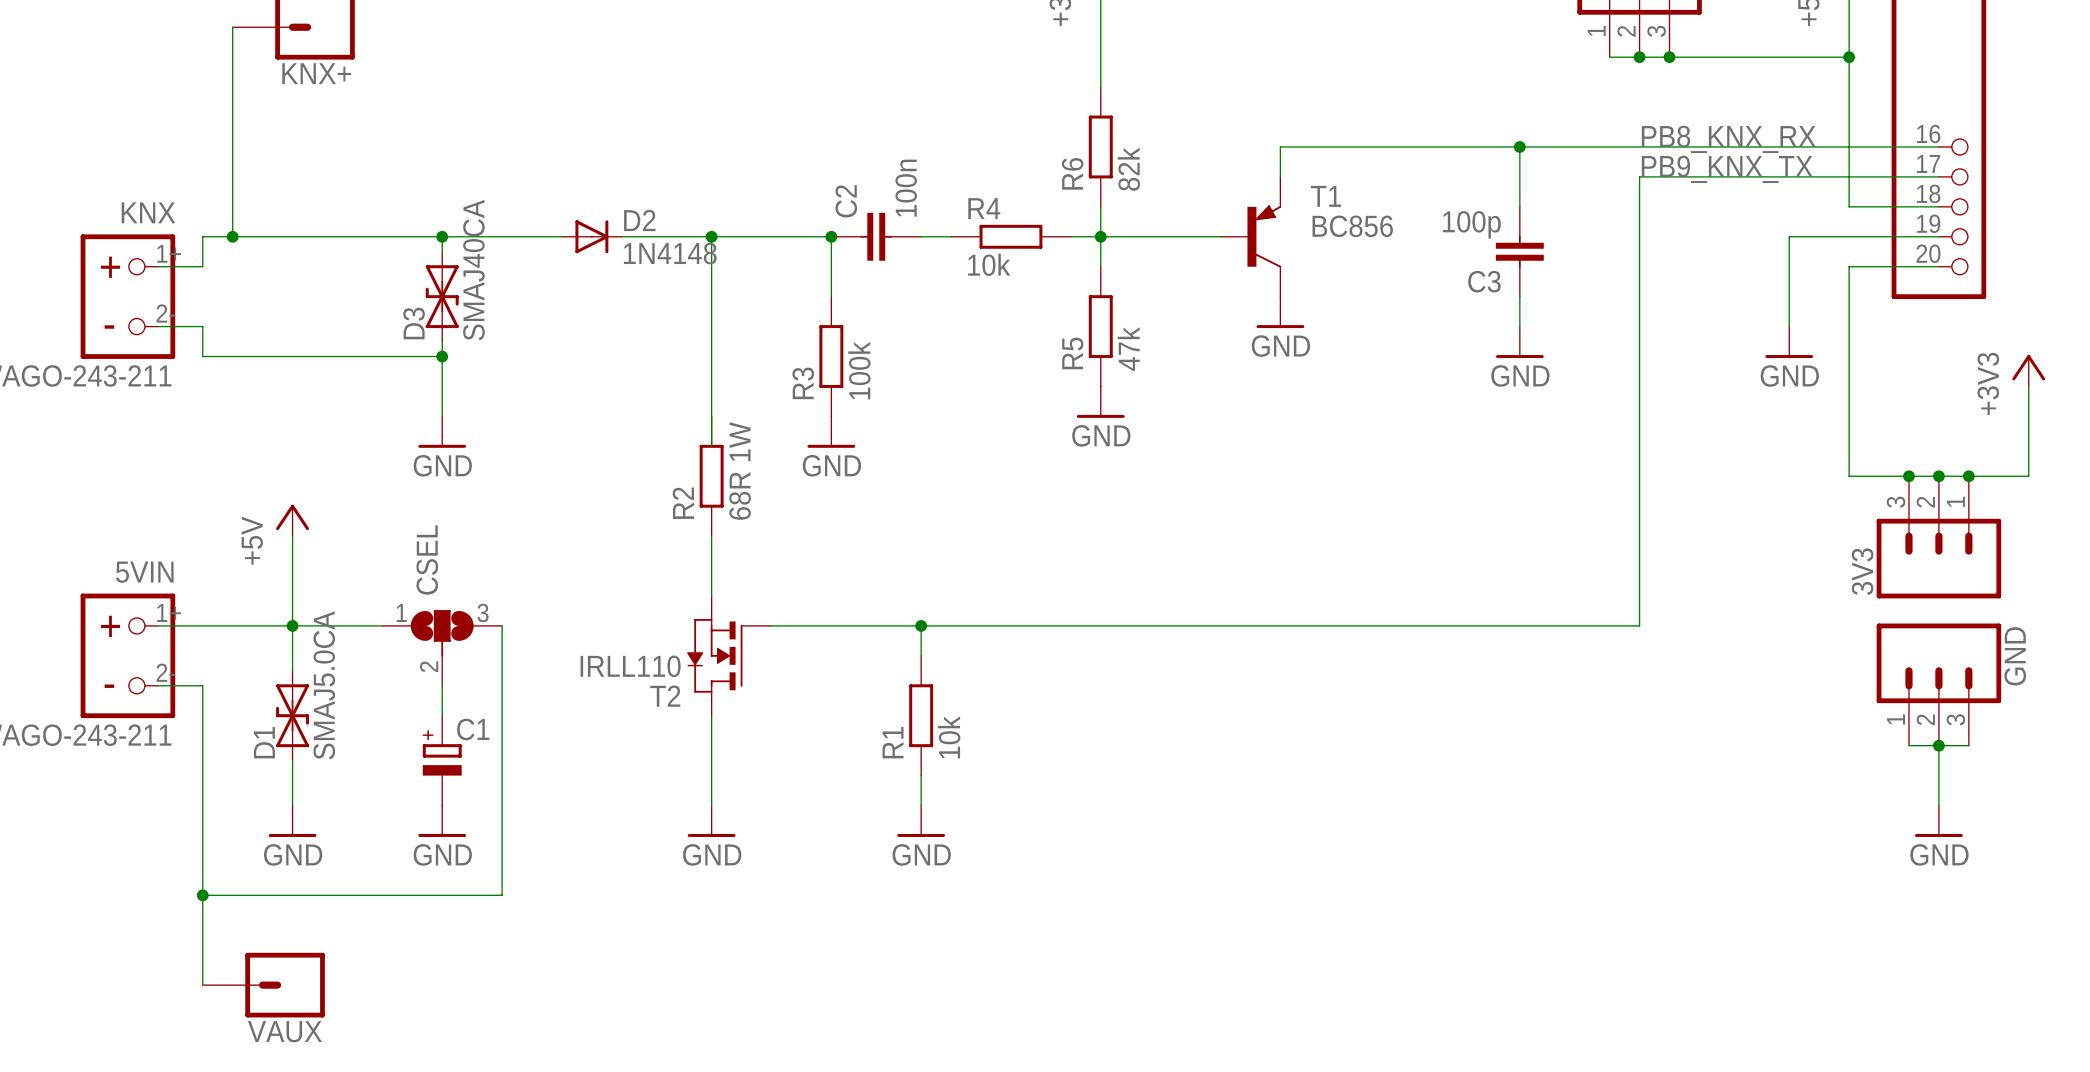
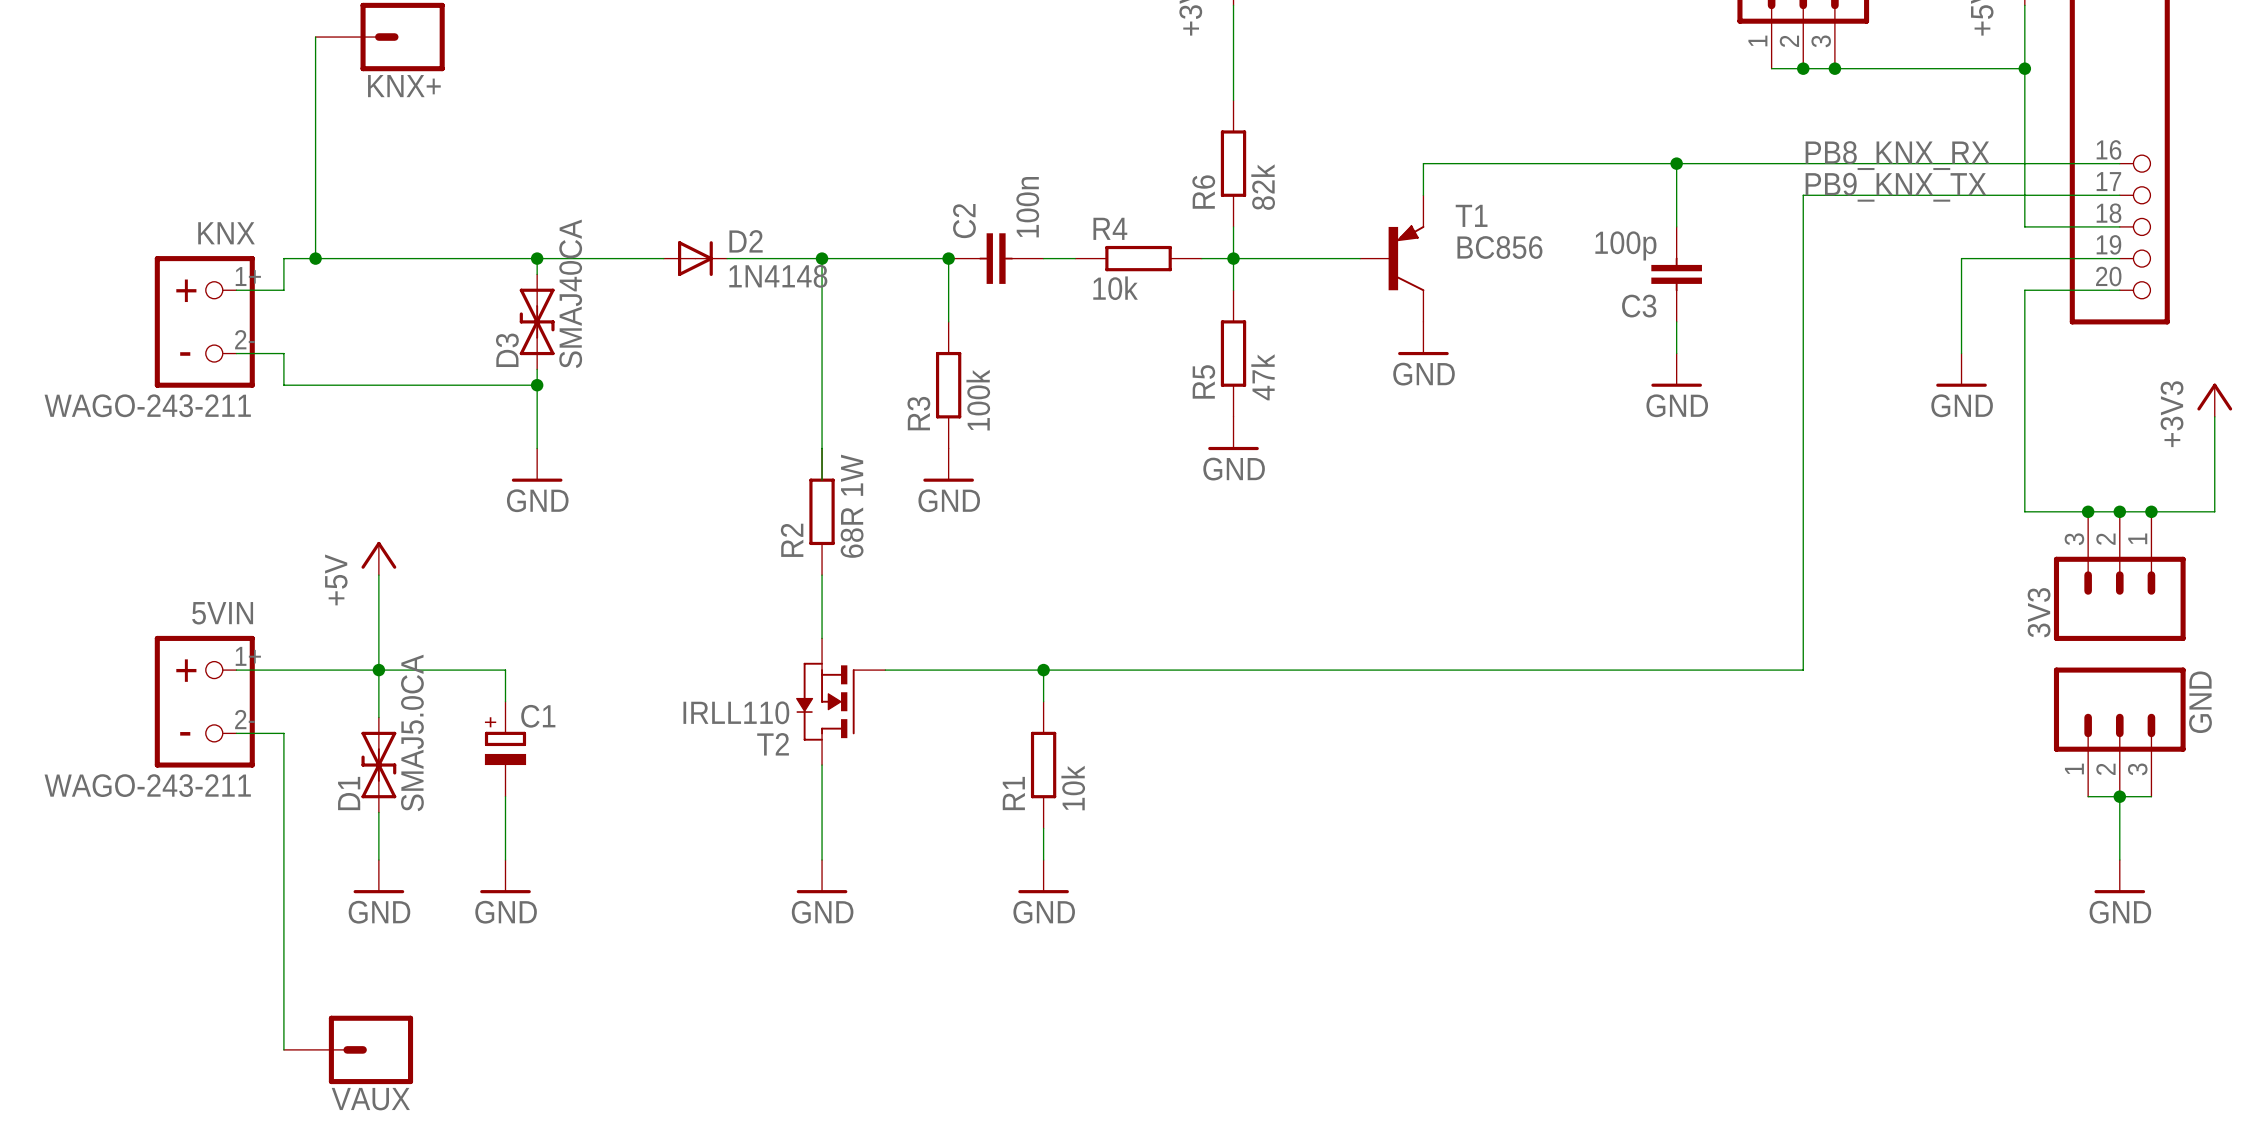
wire: none -> (473, 670) (505, 670) (505, 701)
wire: (502, 625) (502, 895) (202, 895) -> none
CSEL: (442, 647) -> none
wire: (442, 685) (442, 715) -> none
wire: none -> (505, 796) (505, 859)
C1 position: (442, 760) -> (505, 749)
power symbol position: GND (442, 821) -> GND (505, 876)
junction: (202, 895) -> none

